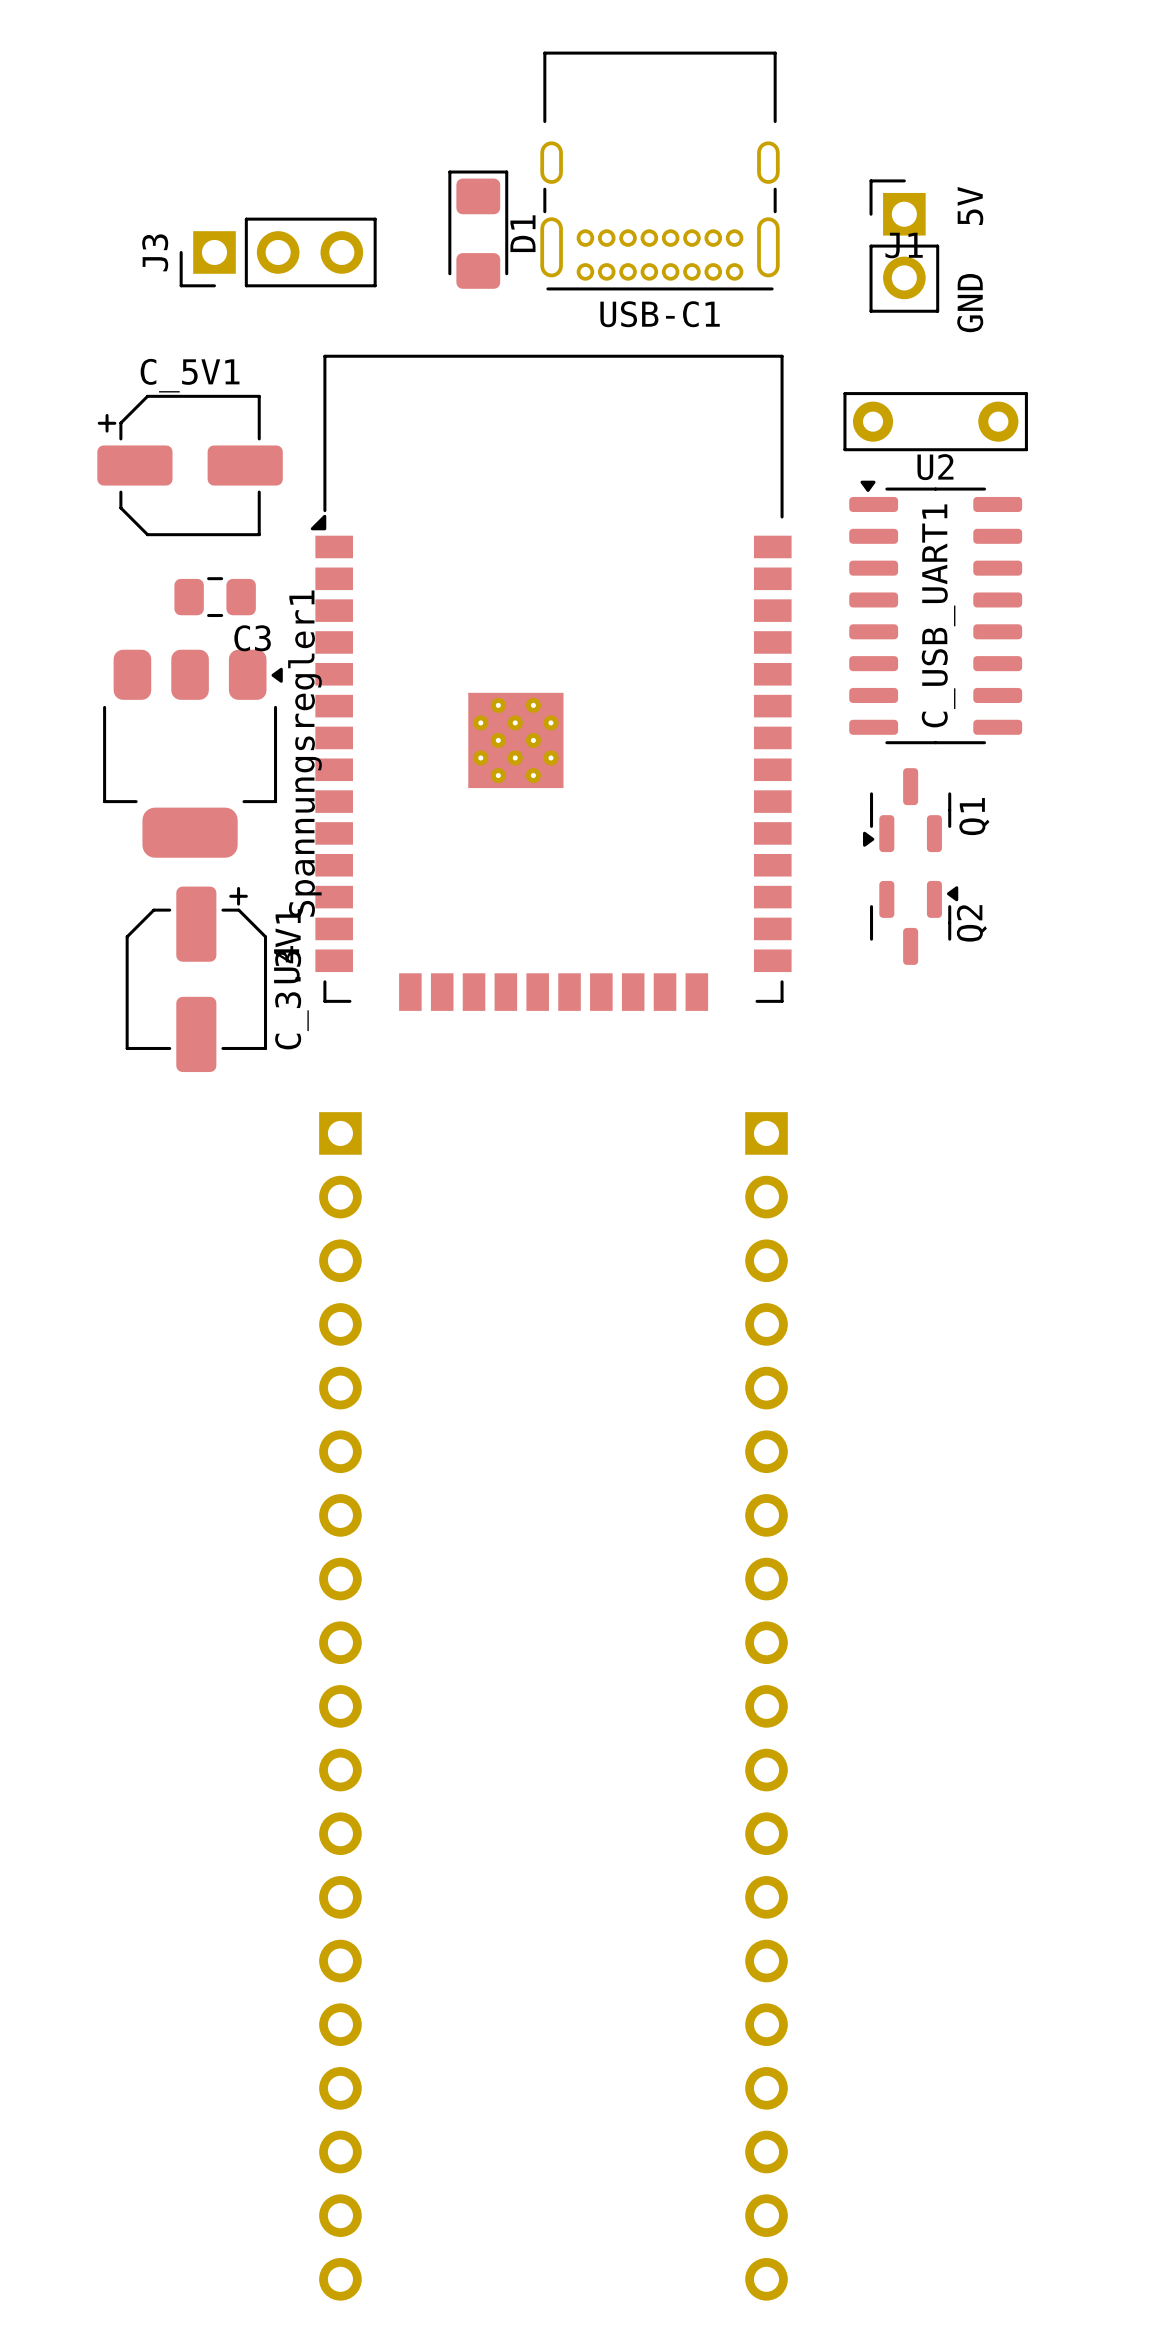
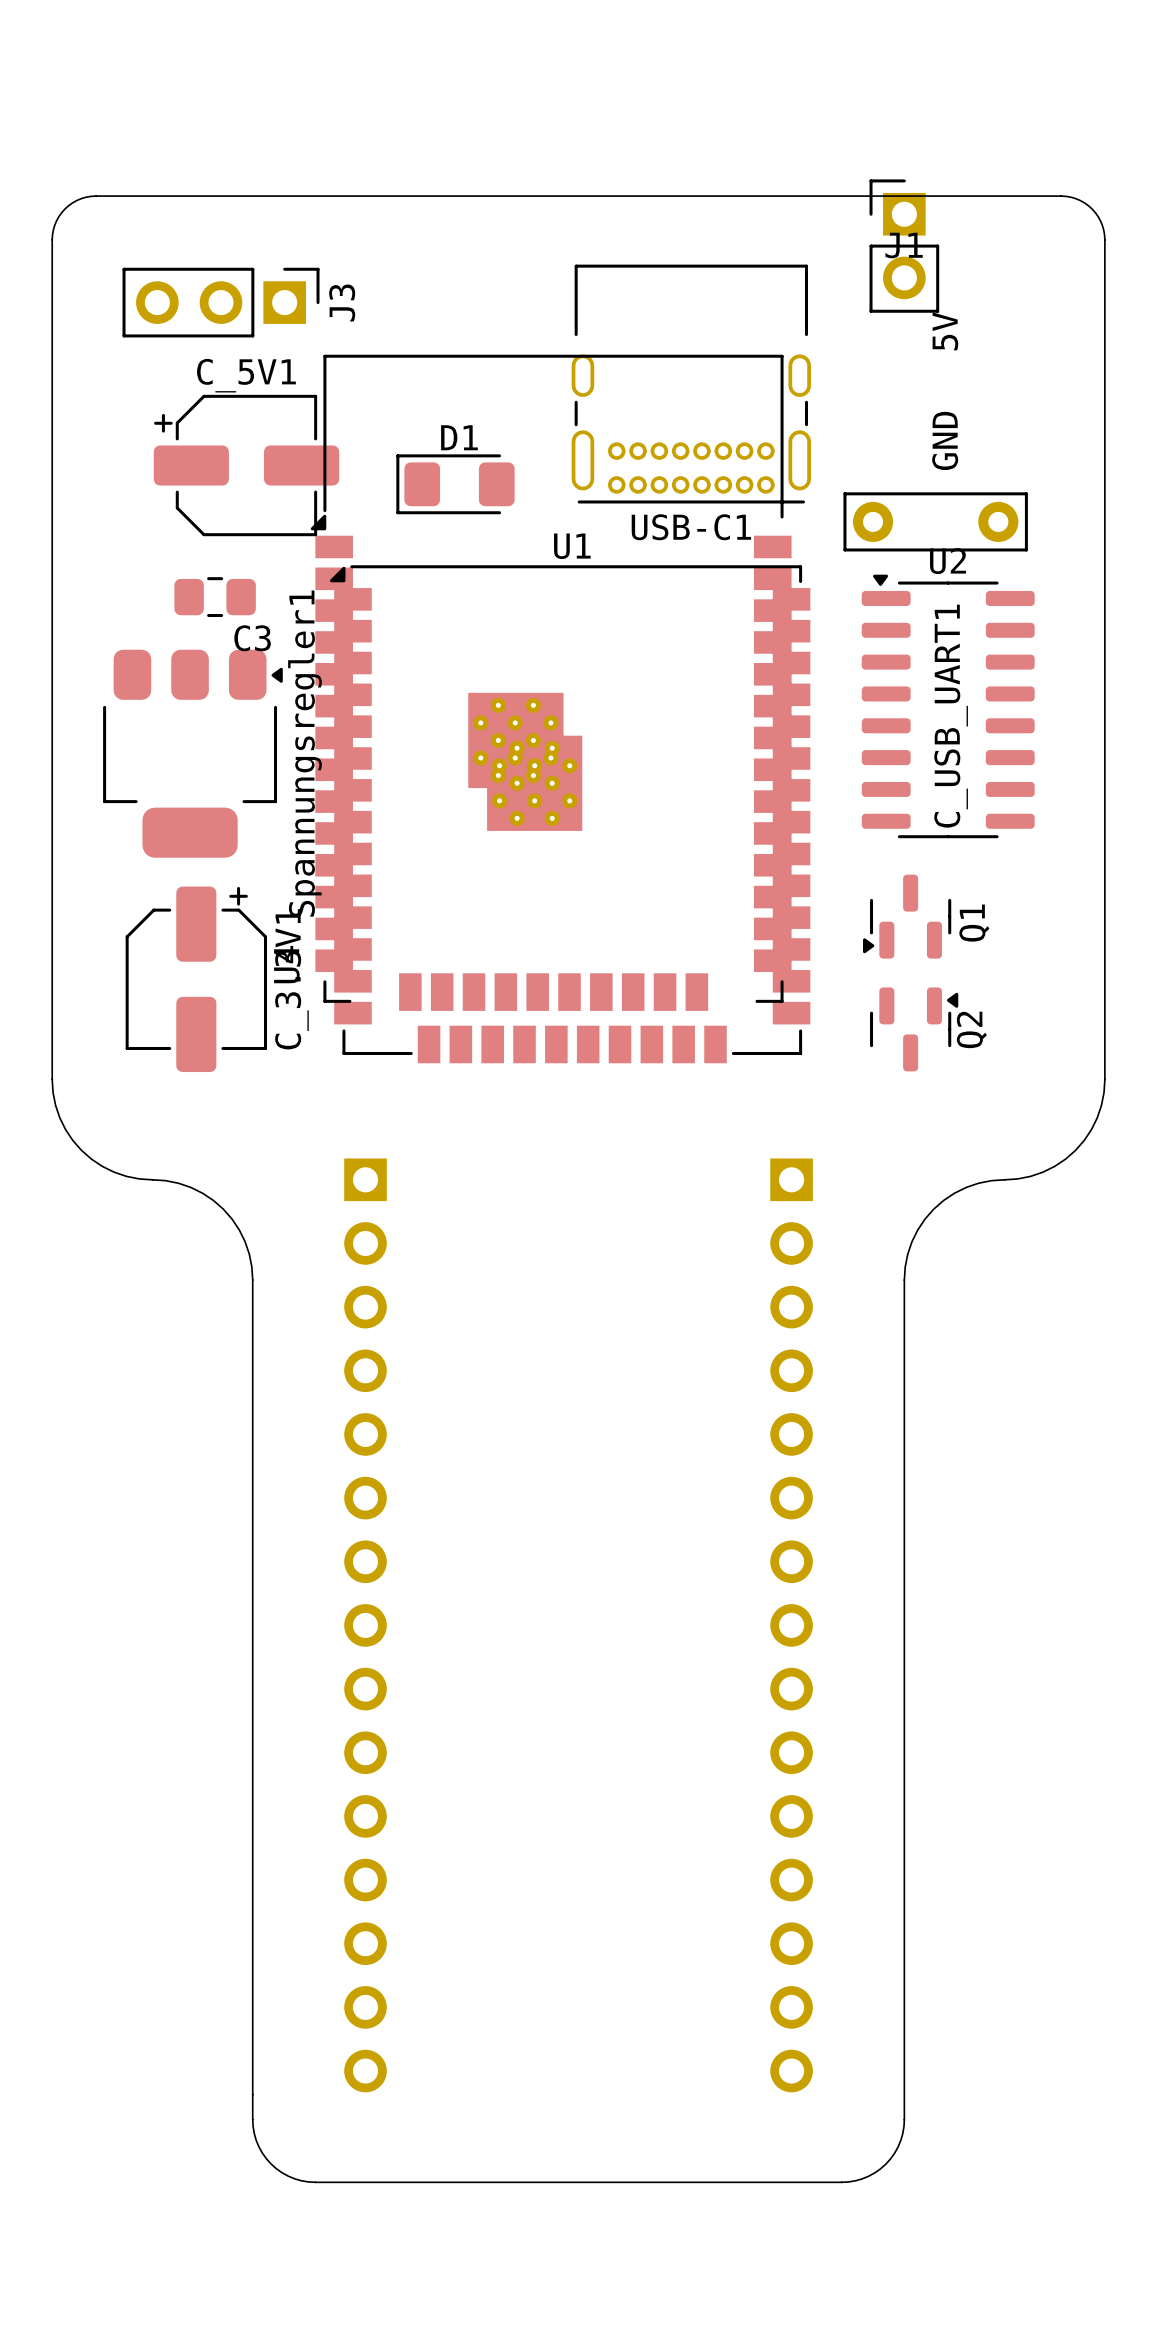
USB-C1 position: (660, 171) -> (691, 384)
board edge: none -> (96, 196) (1061, 196) (1070, 197) (1084, 202) (1095, 212) (1102, 225) (1104, 239) (1104, 1092) (1101, 1105) (1091, 1129) (1084, 1140) (1065, 1159) (1054, 1166) (1030, 1176) (978, 1183) (954, 1193) (933, 1209) (925, 1219) (917, 1229) (907, 1254) (904, 1280) (904, 2119) (900, 2140) (890, 2158) (880, 2168) (862, 2178) (841, 2182) (308, 2181) (288, 2176) (276, 2168) (262, 2153) (256, 2140) (252, 2119) (251, 1266) (245, 1241) (239, 1229) (223, 1209) (213, 1200) (202, 1193) (178, 1183) (126, 1176) (102, 1166) (91, 1159) (72, 1140) (65, 1129) (59, 1117) (53, 1092) (52, 239) (54, 225) (65, 208) (77, 200) (96, 196)
text position: 5V (970, 205) -> 5V (945, 331)
D1 rotation: 0° (478, 229) -> 90° counterclockwise (455, 484)
D1 position: (478, 229) -> (455, 484)
J3 rotation: 0° (278, 252) -> 180° (221, 302)
text position: GND (970, 303) -> GND (945, 440)
C_USB_UART1 position: (935, 421) -> (935, 521)
C_5V1 position: (190, 465) -> (246, 465)
U2 position: (935, 612) -> (948, 706)
C_USB_UART1 name position: C_USB_UART1 (938, 615) -> C_USB_UART1 (951, 716)
Q1 position: (907, 810) -> (907, 916)
U1: none -> (570, 814)
Q2 position: (914, 922) -> (914, 1029)
part: none -> (365, 1625)
part: none -> (791, 1625)
part: (340, 1706) -> none
part: (766, 1706) -> none

